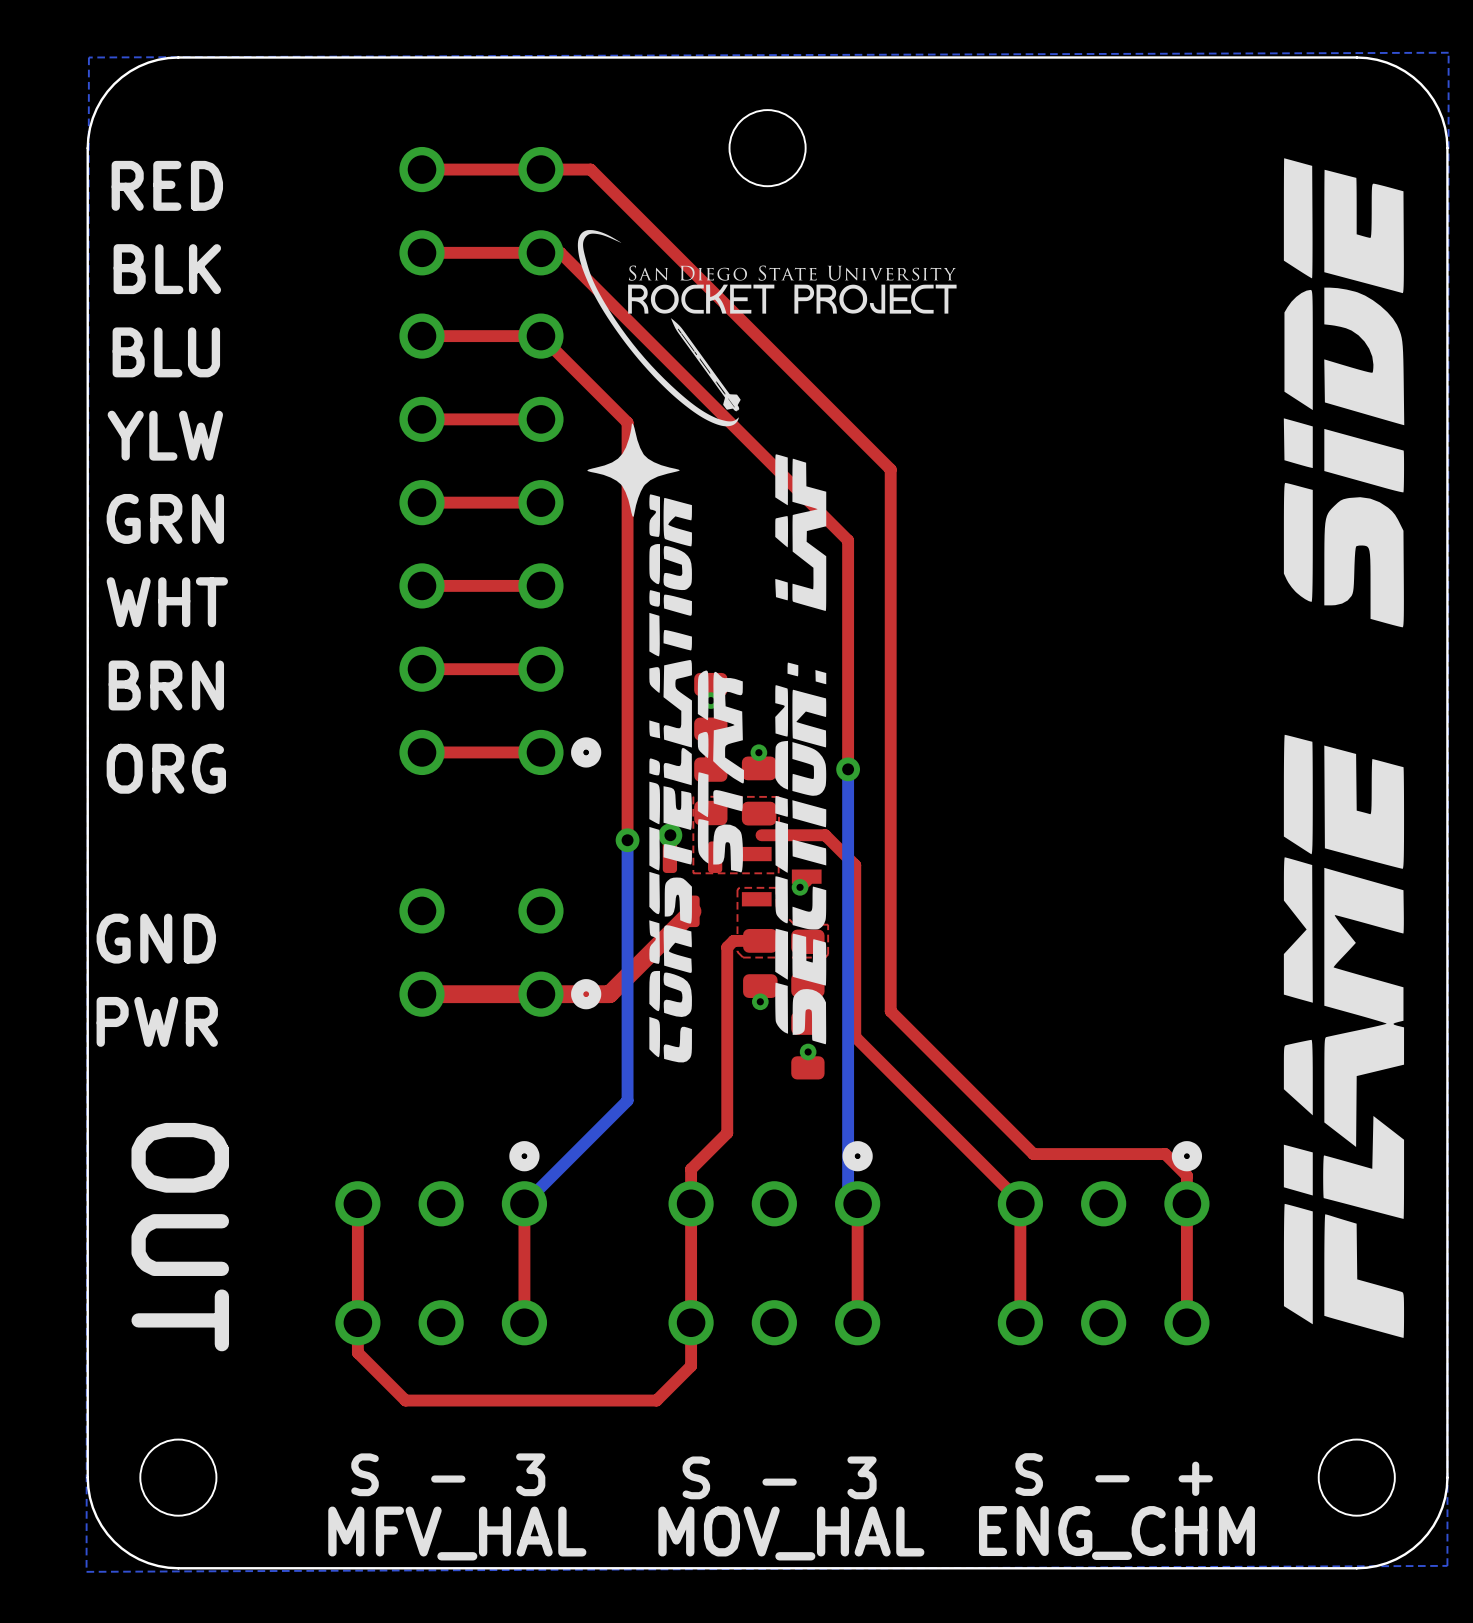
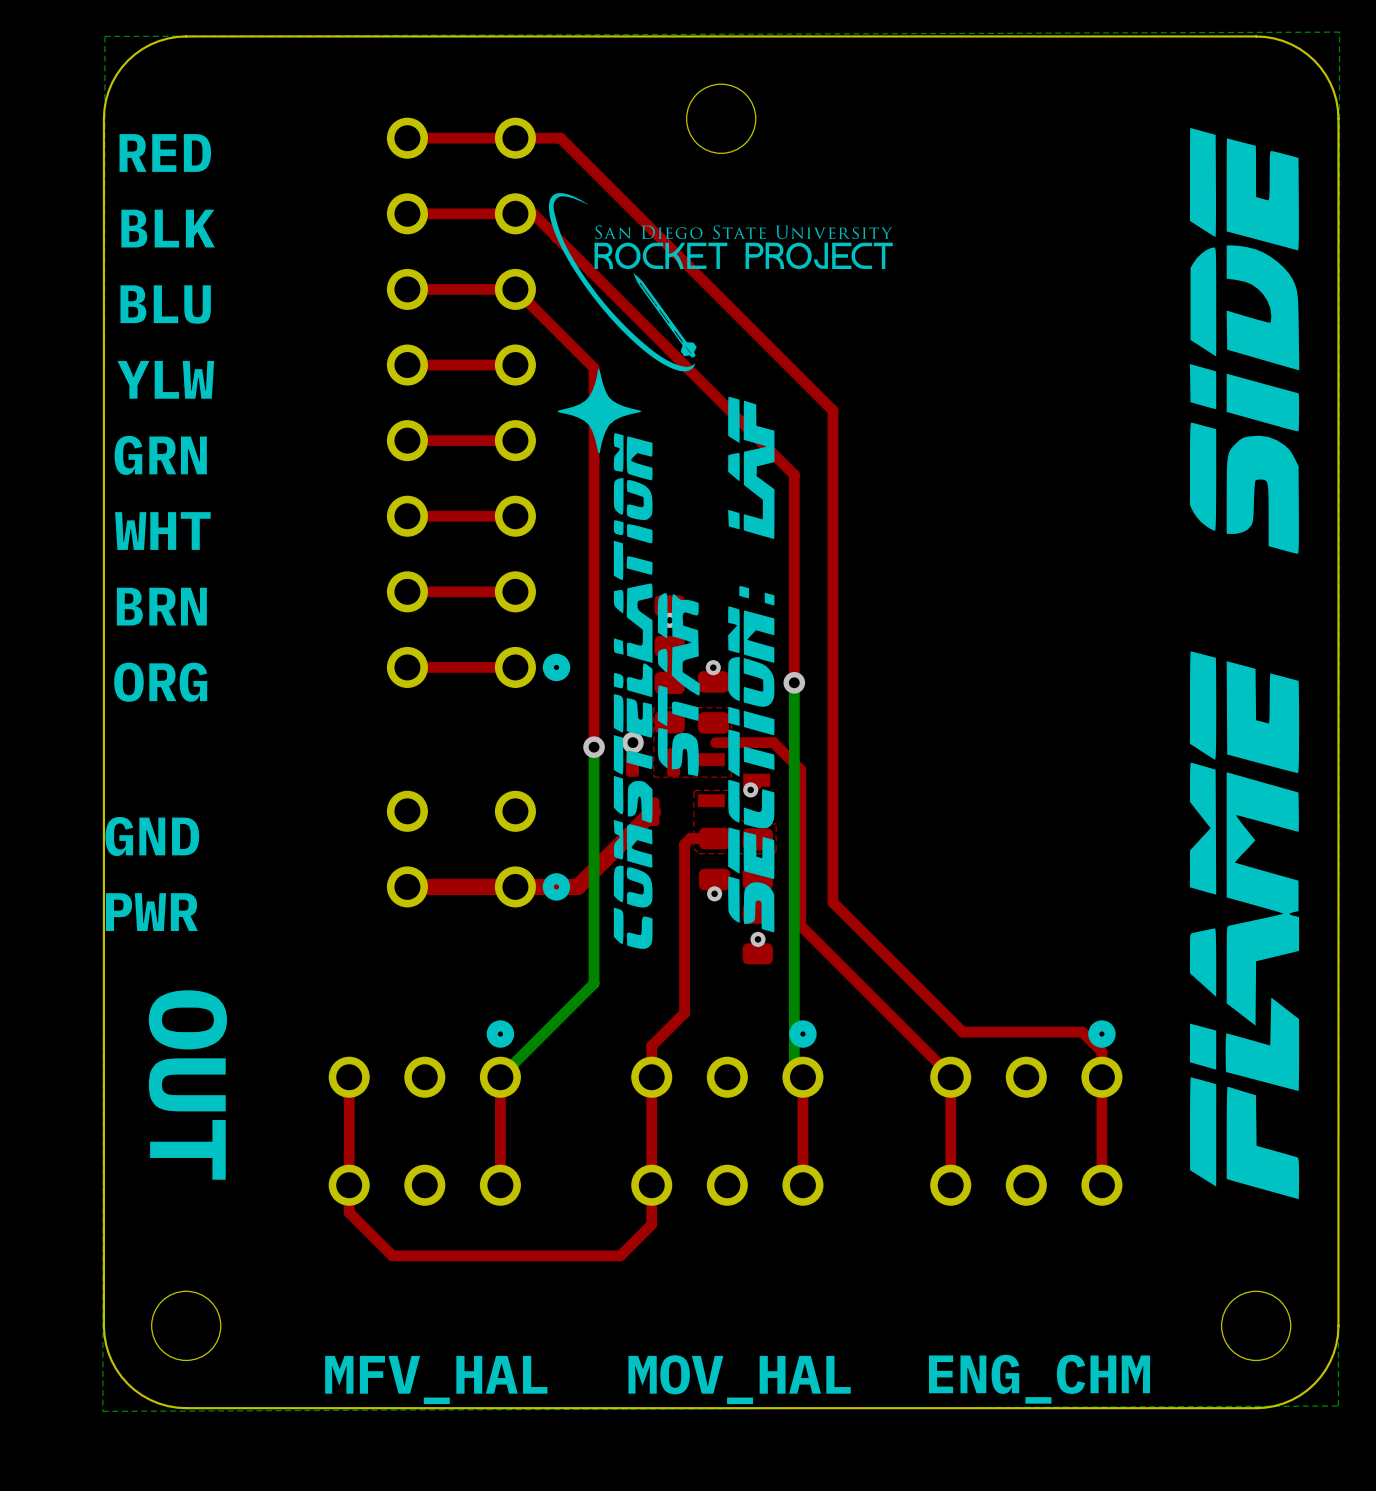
text: S (365, 1474) -> none
text: 3 (530, 1474) -> none
text: S (1029, 1474) -> none
text: S (696, 1477) -> none
text: 3 (862, 1477) -> none
text: - (1112, 1478) -> none
text: + (1195, 1478) -> none
text: - (448, 1479) -> none
text: - (779, 1482) -> none

